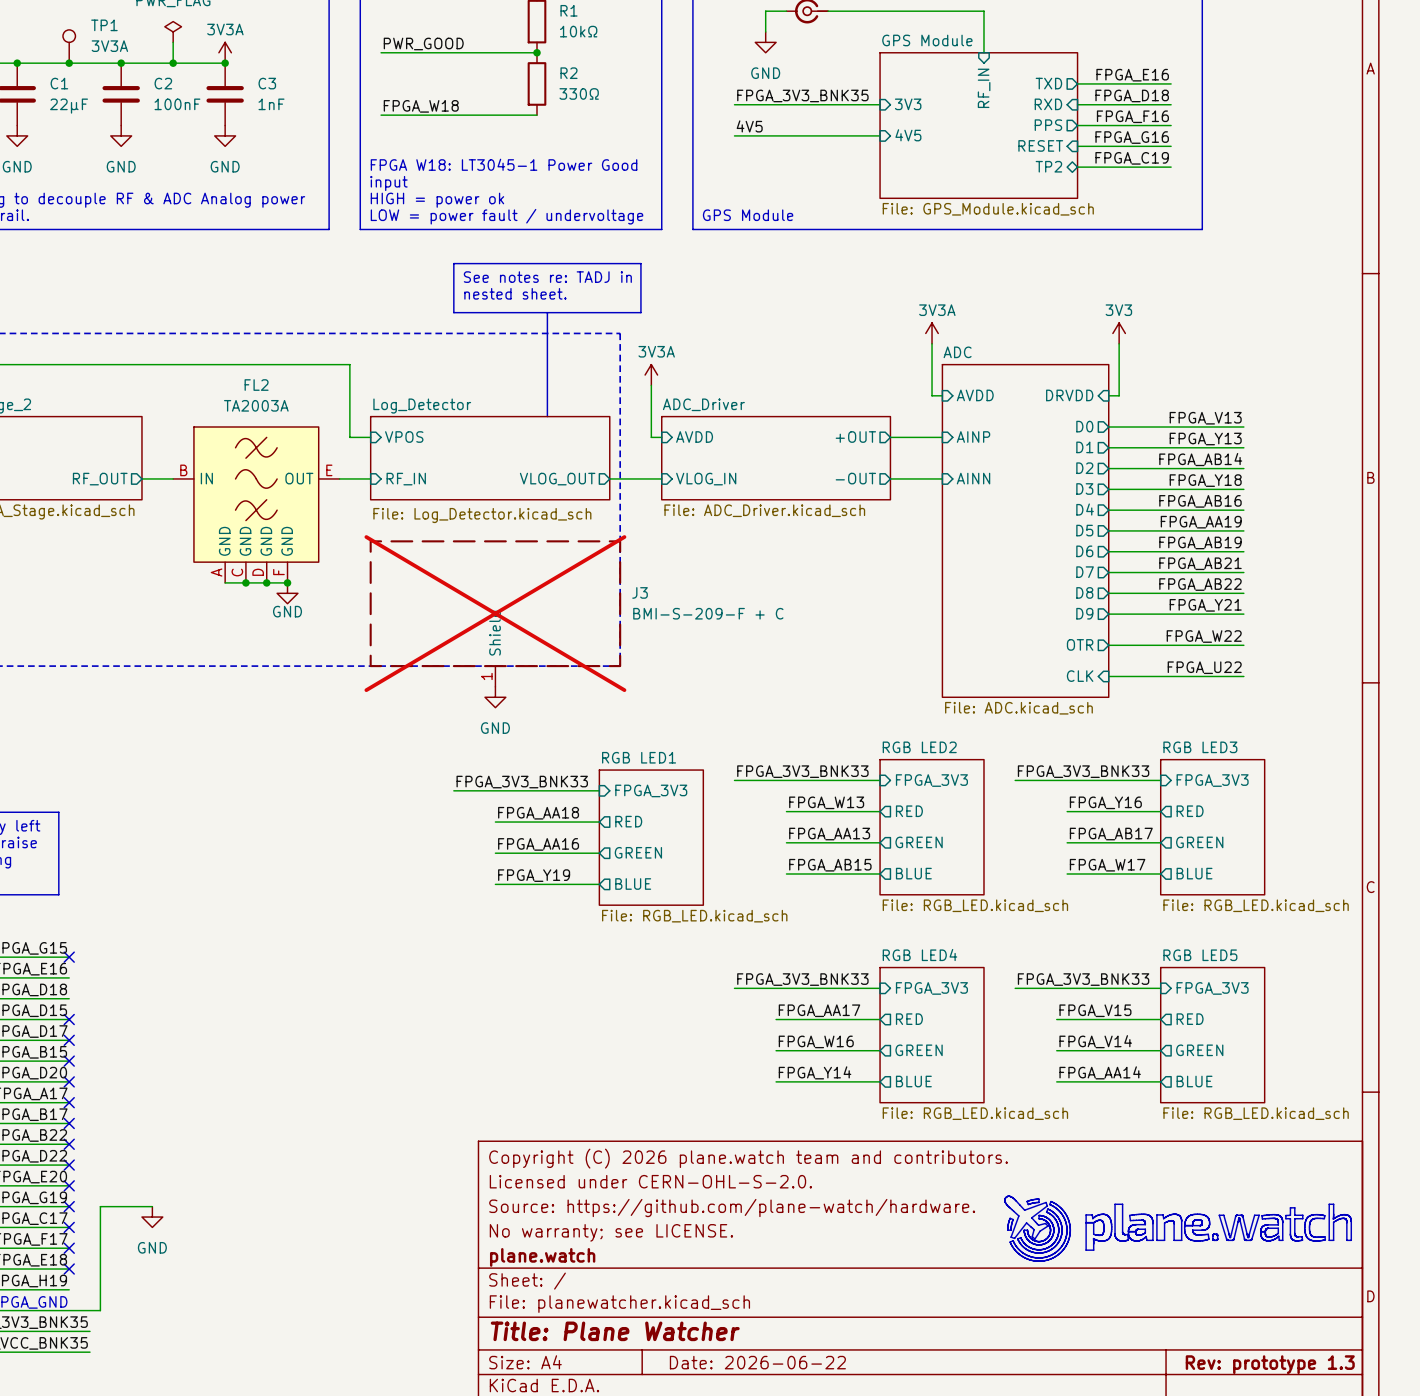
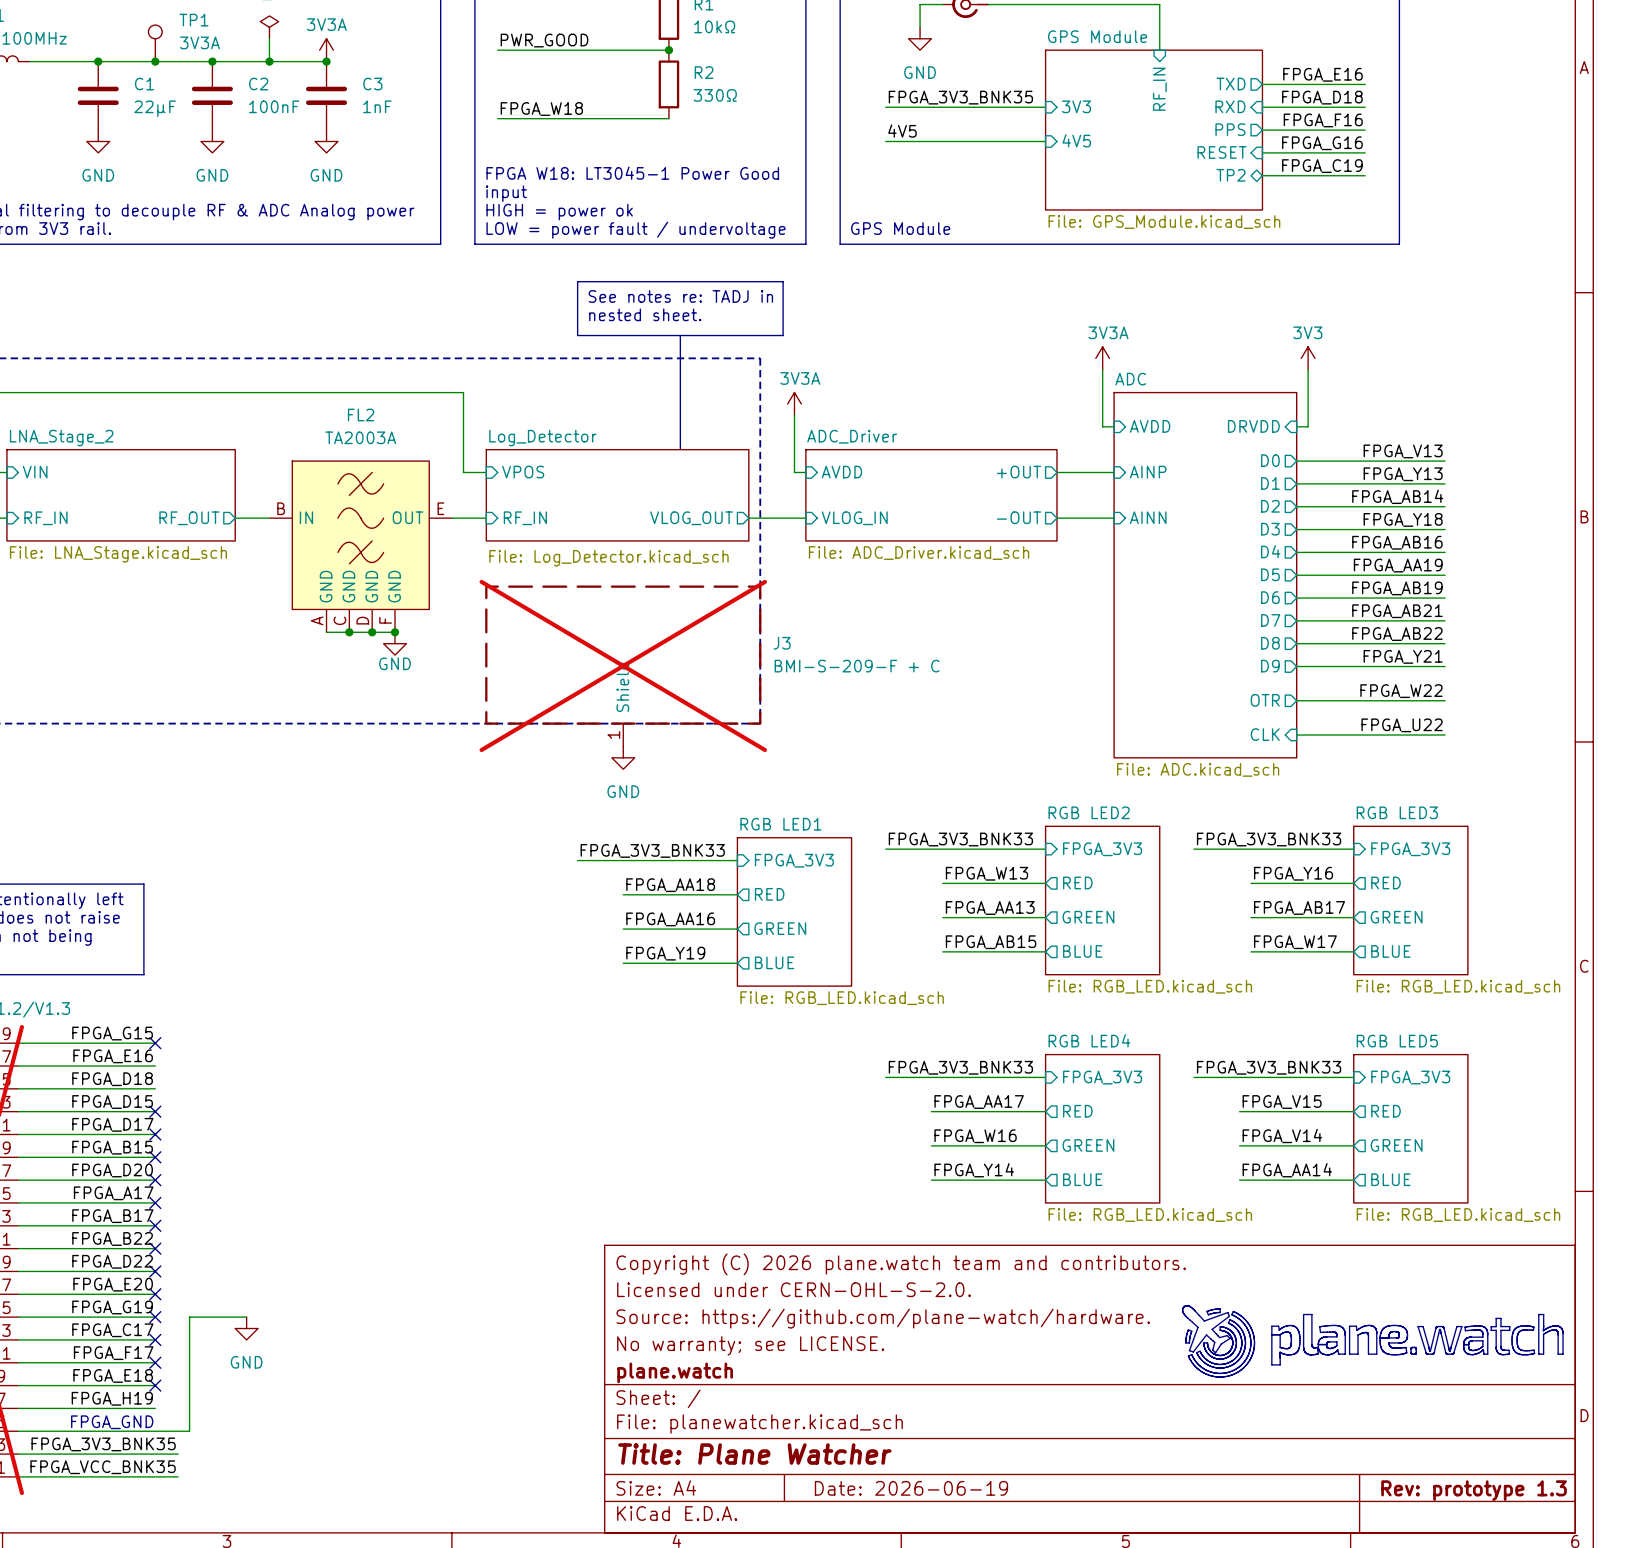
title block: Date: 2026-06-22 (757, 1362) -> Date: 2026-06-19 (911, 1488)

